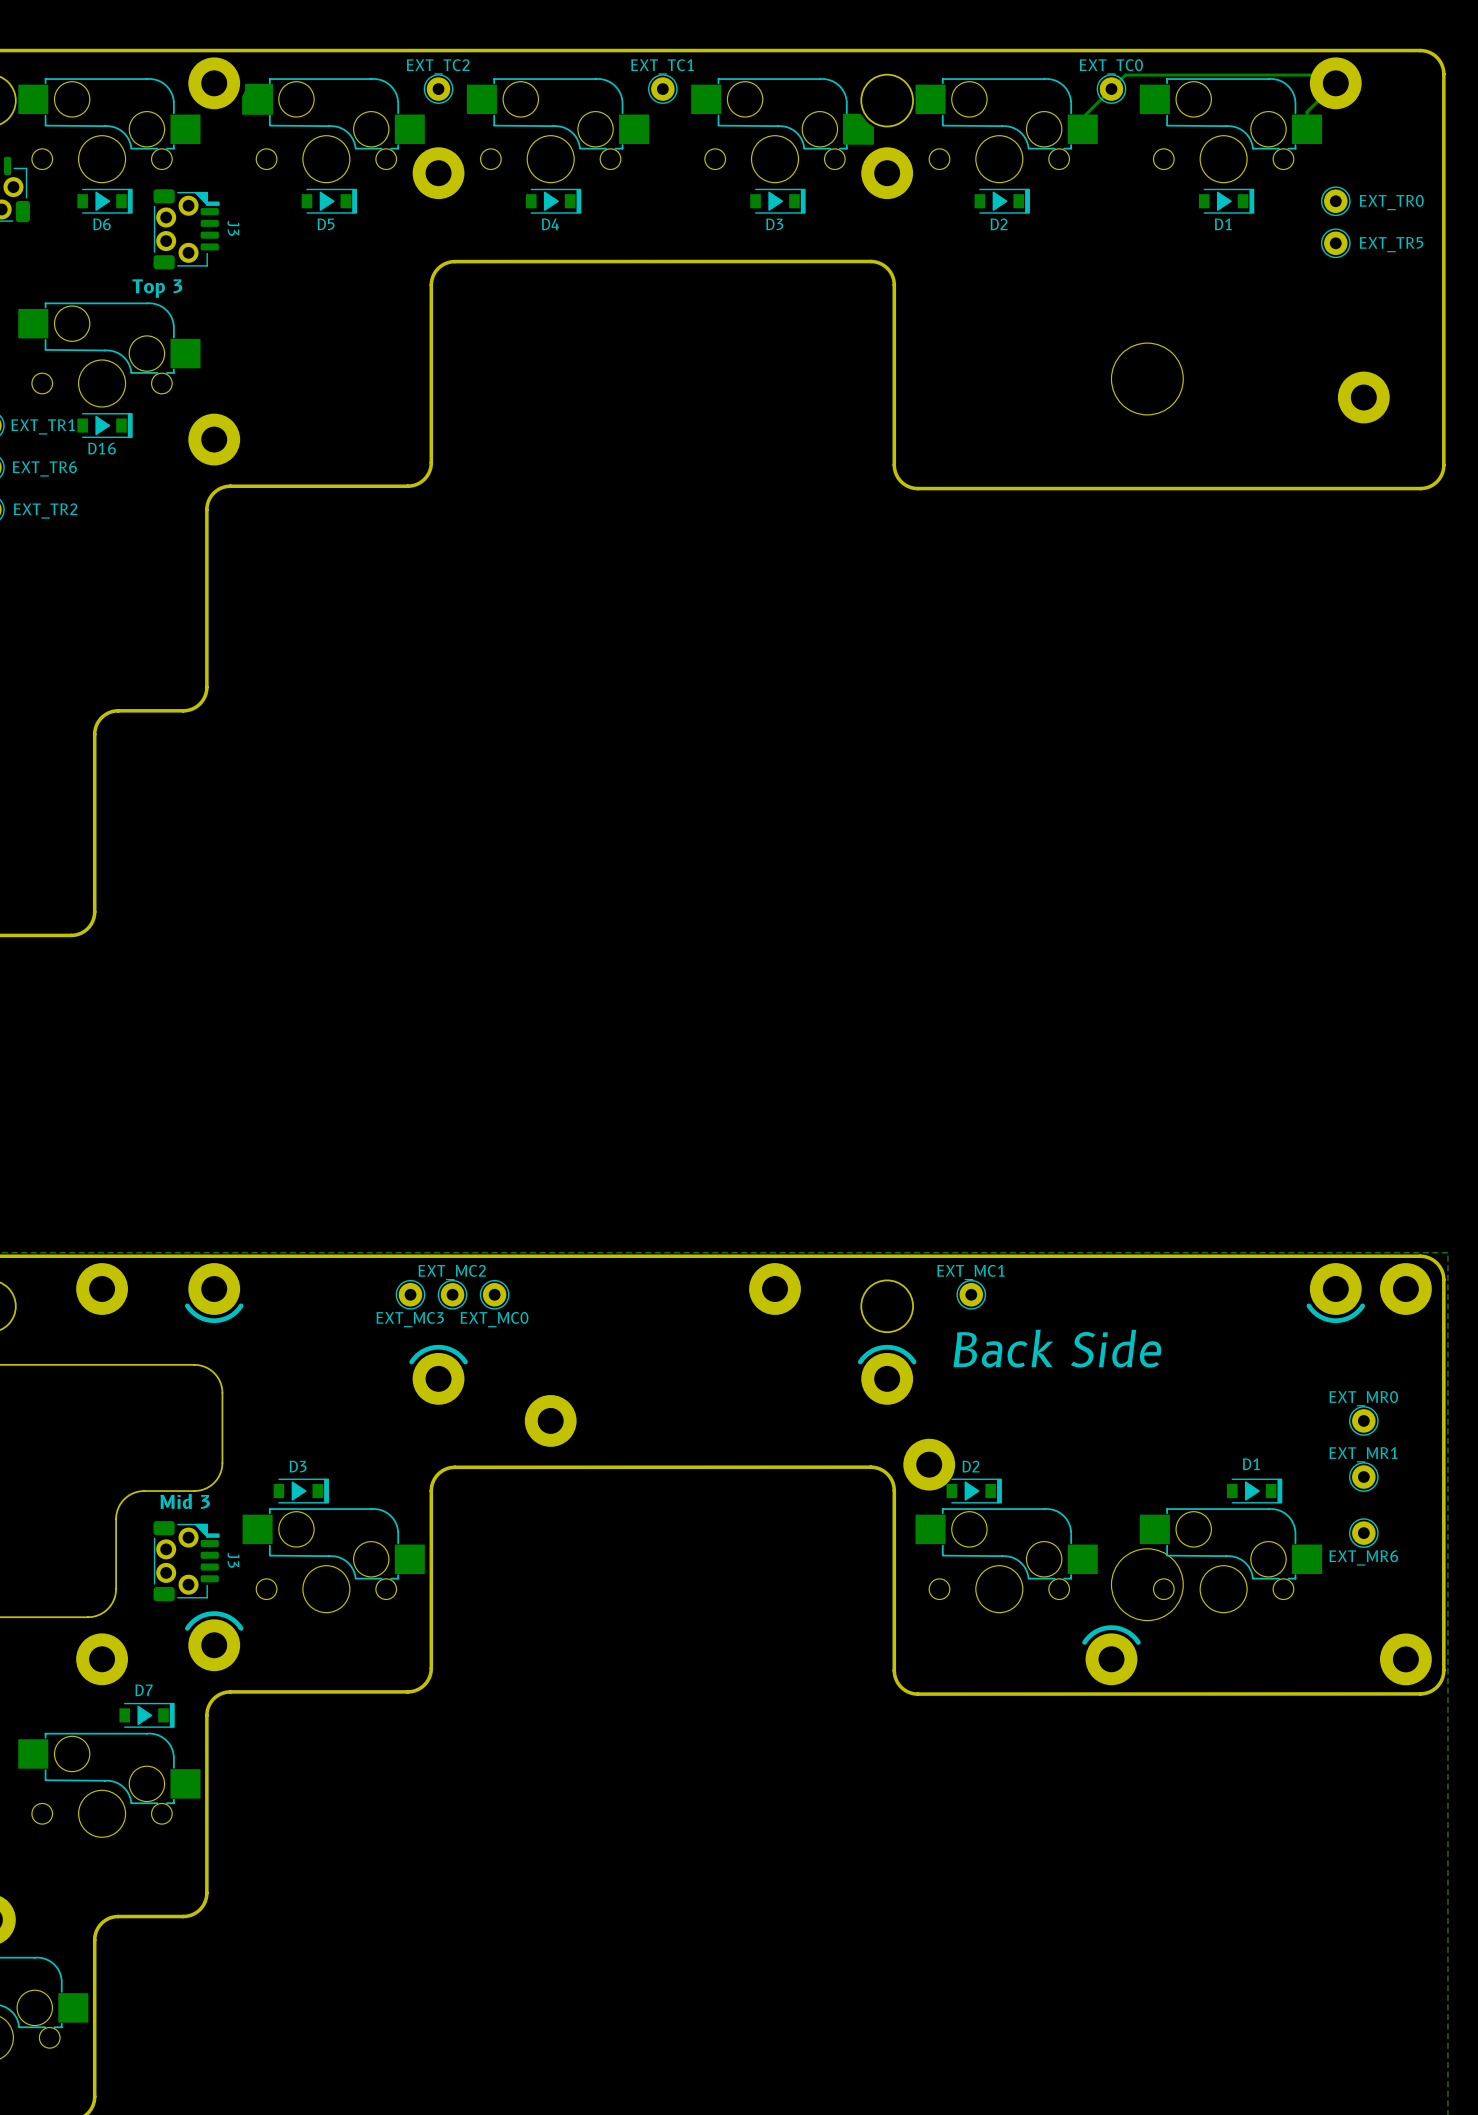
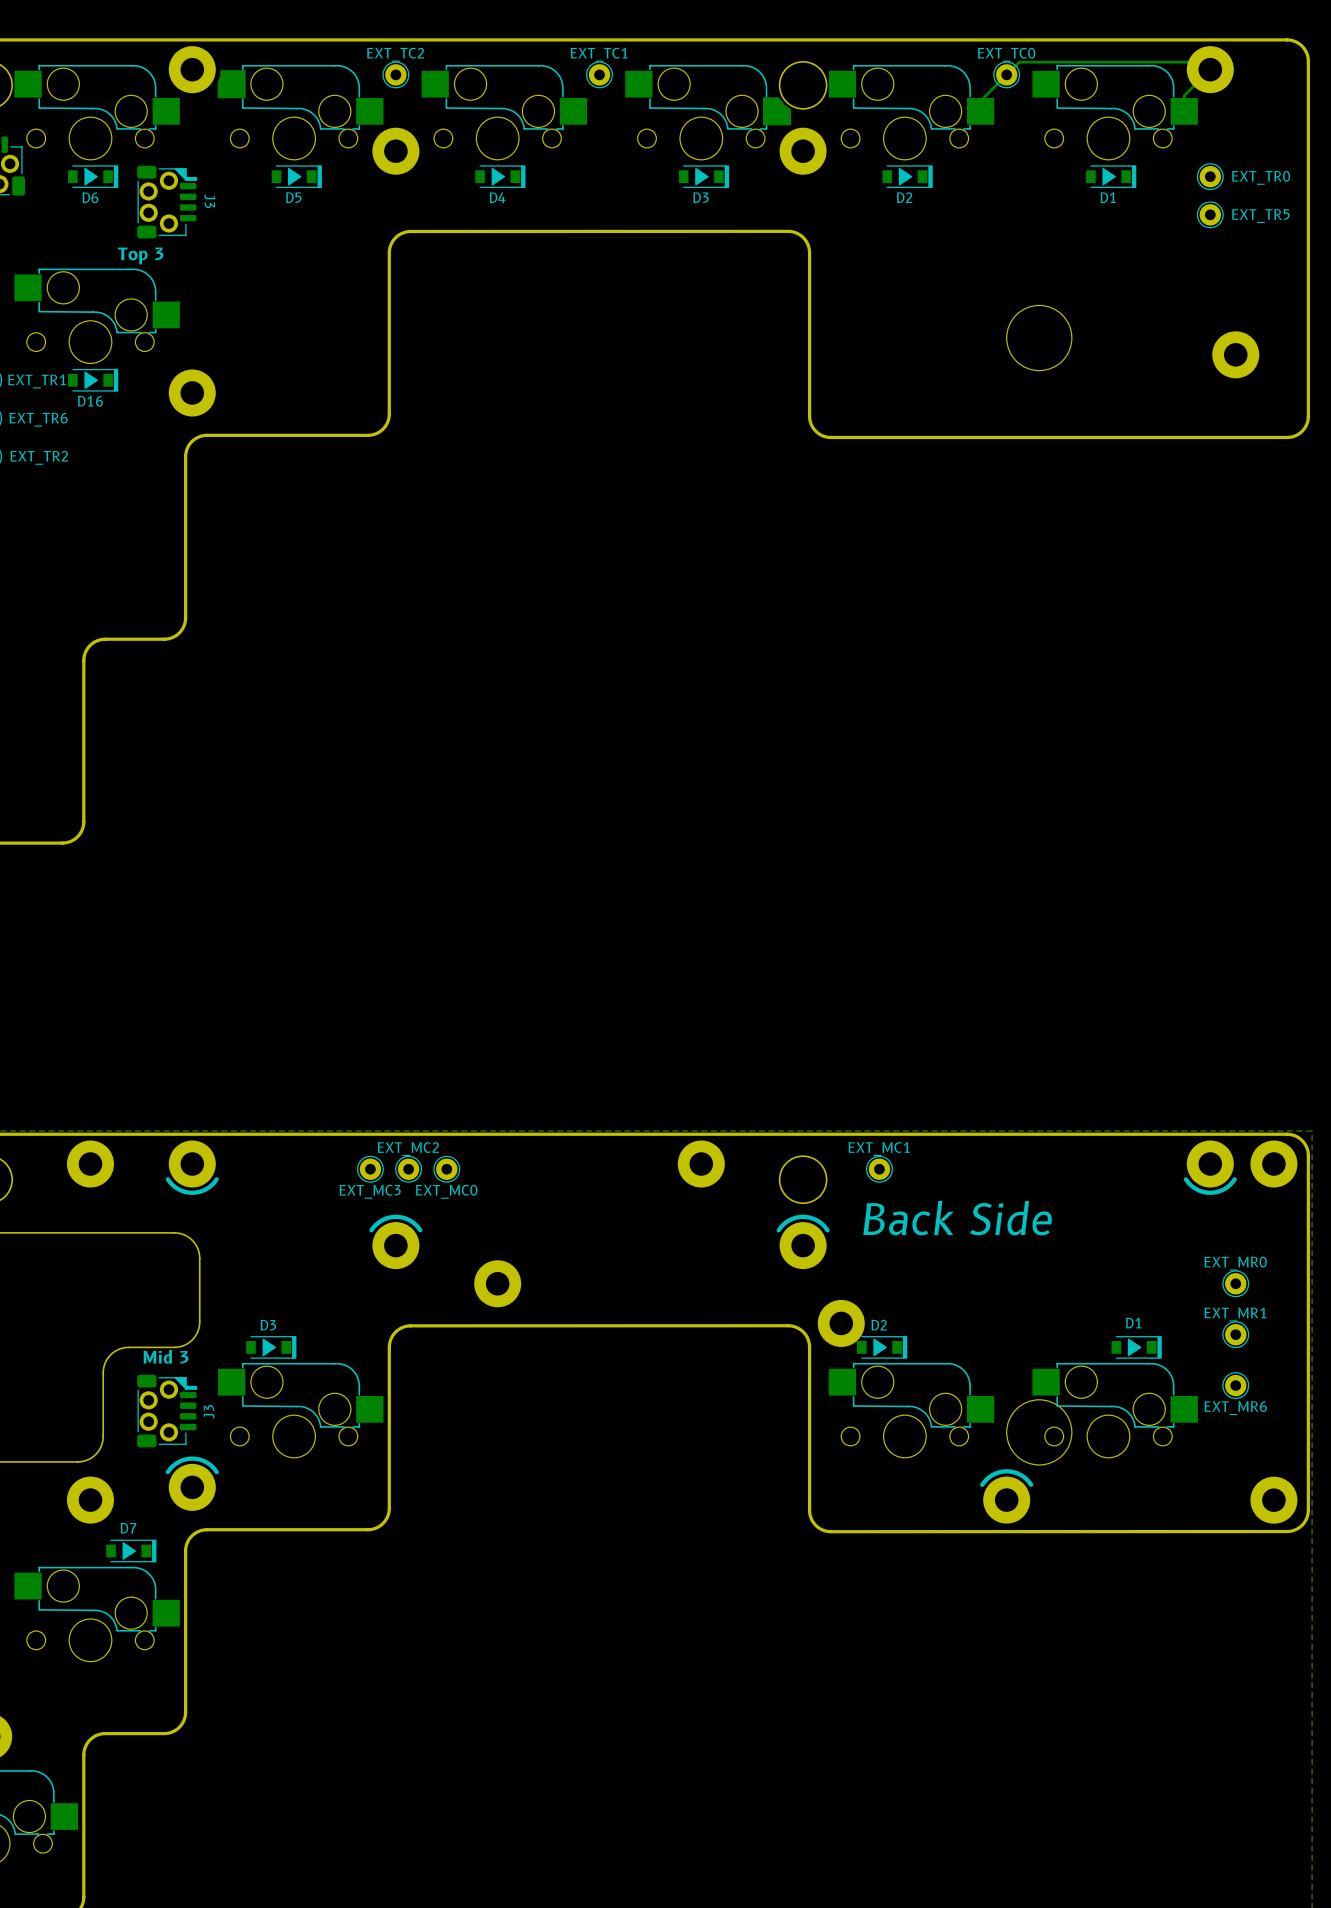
J3 name rotation: 0° (233, 1560) -> 180° (209, 1411)

